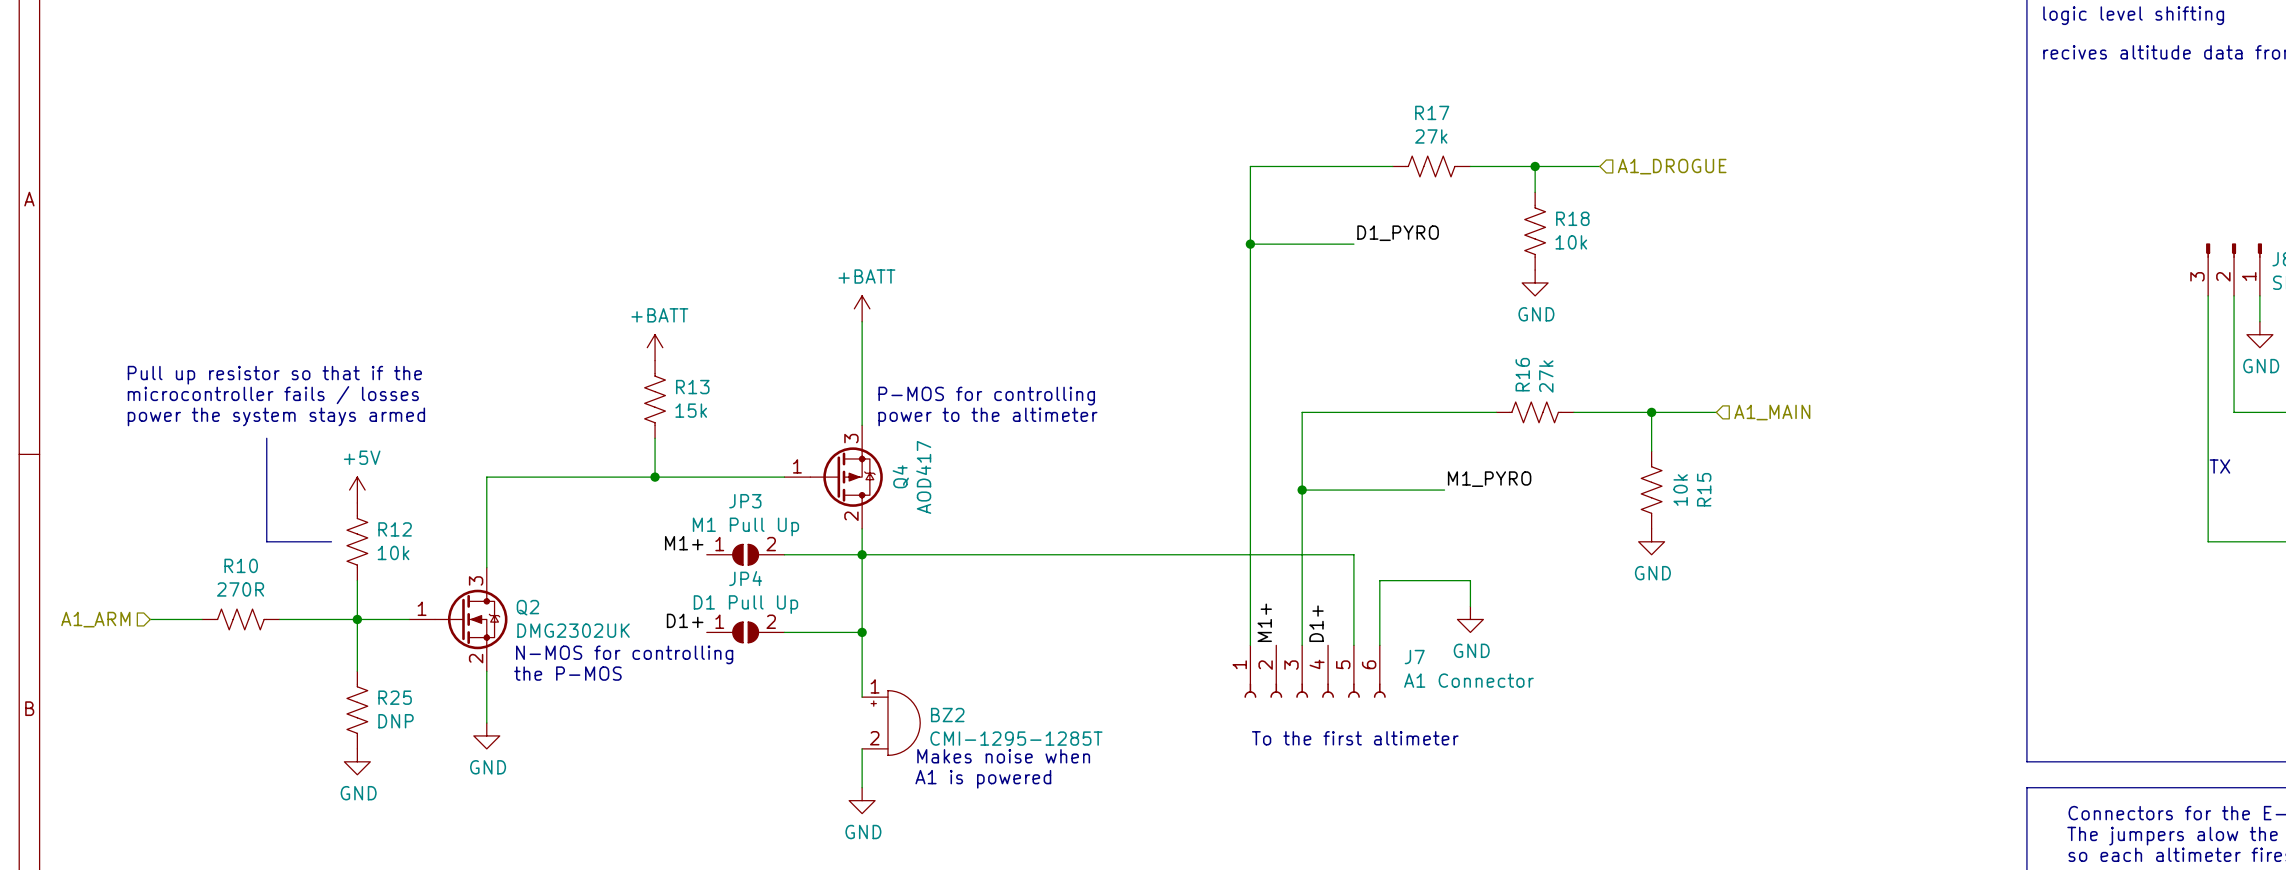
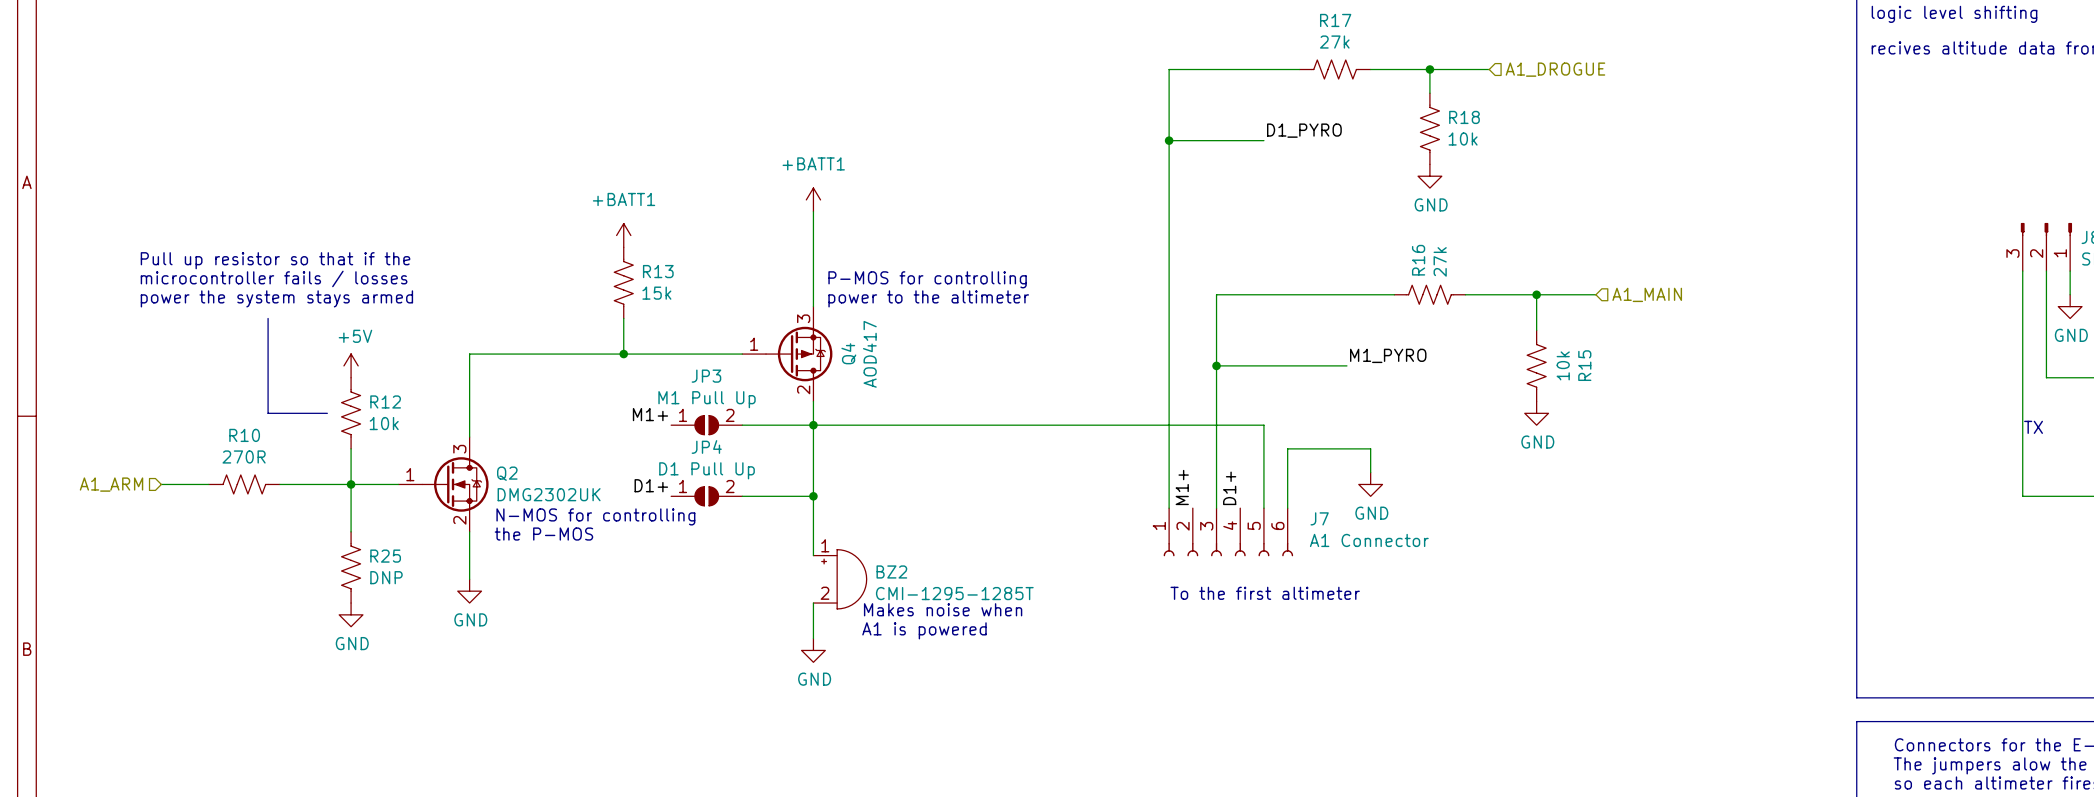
junction: none -> (1429, 69)
junction: none -> (1169, 140)
wire: (1392, 166) (1250, 166) (1250, 645) -> (1299, 69) (1169, 69) (1169, 508)
R17 position: (1431, 166) -> (1335, 69)
wire: (1470, 166) (1599, 166) -> (1370, 69) (1489, 69)
wire: (1535, 166) (1535, 192) -> (1429, 69) (1429, 93)
junction: (1535, 166) -> none
hierarchical label position: A1_DROGUE (1672, 166) -> A1_DROGUE (1555, 69)
power symbol: none -> +BATT1 (813, 199)
R18 position: (1535, 231) -> (1429, 128)
label position: D1_PYRO (1398, 233) -> D1_PYRO (1304, 130)
wire: (1250, 244) (1353, 244) -> (1169, 140) (1263, 140)
junction: (1250, 244) -> none
power symbol: none -> +BATT1 (623, 235)
power symbol position: GND (1535, 282) -> GND (1429, 176)
power symbol: +BATT (862, 308) -> none
wire: (862, 321) (862, 425) -> (813, 211) (813, 306)
junction: none -> (1536, 294)
power symbol: +BATT (655, 347) -> none
text position: Pull up resistor so that if the (274, 375) -> Pull up resistor so that if the (275, 260)
junction: none -> (623, 354)
text position: microcontroller fails / losses (273, 395) -> microcontroller fails / losses (274, 278)
text position: P-MOS for controlling (986, 396) -> P-MOS for controlling (927, 279)
R13 position: (655, 399) -> (623, 282)
wire: none -> (1216, 365) (1346, 365)
junction: none -> (1216, 365)
wire: (1496, 412) (1302, 412) (1302, 645) -> (1394, 294) (1216, 294) (1216, 508)
R16 position: (1535, 412) -> (1429, 294)
wire: (1573, 412) (1716, 412) -> (1465, 294) (1595, 294)
wire: (1651, 412) (1651, 451) -> (1536, 294) (1536, 330)
junction: (1651, 412) -> none
hierarchical label position: A1_MAIN (1772, 412) -> A1_MAIN (1647, 294)
text position: power the system stays armed (276, 416) -> power the system stays armed (276, 298)
text position: power to the altimeter (987, 416) -> power to the altimeter (928, 298)
line: (266, 438) (266, 541) (331, 541) -> (268, 318) (268, 413) (327, 413)
wire: (655, 438) (655, 477) -> (623, 318) (623, 354)
power symbol: none -> GND (1536, 413)
junction: none -> (813, 425)
junction: (655, 477) -> none
wire: (784, 477) (486, 477) (486, 567) -> (742, 354) (469, 354) (469, 437)
Q4 position: (833, 477) -> (787, 354)
label position: M1_PYRO (1489, 479) -> M1_PYRO (1388, 355)
power symbol position: +5V (357, 490) -> +5V (351, 365)
wire: (1302, 490) (1405, 490) -> (1287, 508) (1287, 448)
junction: (1302, 490) -> none
wire: none -> (1323, 448) (1370, 448) (1370, 472)
R15 position: (1651, 490) -> (1536, 365)
junction: none -> (351, 484)
wire: (862, 528) (862, 697) -> (813, 401) (813, 555)
power symbol: none -> GND (1370, 484)
R12 position: (357, 541) -> (351, 413)
power symbol: GND (1651, 541) -> none
label position: M1+ (684, 543) -> M1+ (650, 414)
JP3 position: (745, 554) -> (706, 425)
wire: (784, 554) (1353, 554) (1353, 645) -> (742, 425) (1263, 425) (1263, 508)
junction position: (862, 554) -> (813, 496)
wire: (357, 580) (357, 671) -> (351, 448) (351, 531)
wire: (1470, 606) (1470, 580) (1379, 580) (1379, 645) -> none
hierarchical label position: A1_ARM (95, 619) -> A1_ARM (111, 484)
wire: (150, 619) (202, 619) -> (161, 484) (208, 484)
R10 position: (240, 619) -> (244, 484)
wire: (279, 619) (409, 619) -> (279, 484) (398, 484)
junction: (357, 619) -> none
Q2 position: (458, 619) -> (443, 484)
power symbol: GND (1470, 619) -> none
label position: D1+ (685, 620) -> D1+ (651, 485)
label position: M1+ (1264, 622) -> M1+ (1182, 487)
label position: D1+ (1316, 623) -> D1+ (1229, 488)
JP4 position: (745, 632) -> (706, 496)
wire: (784, 632) (862, 632) -> (742, 496) (813, 496)
junction: (862, 632) -> none
power symbol: none -> GND (469, 591)
text position: N-MOS for controlling (624, 654) -> N-MOS for controlling (595, 516)
power symbol: none -> GND (351, 614)
wire: (486, 671) (486, 723) -> (469, 531) (469, 579)
J7 position: (1315, 671) -> (1228, 532)
text position: the P-MOS (567, 673) -> the P-MOS (543, 534)
R25 position: (357, 710) -> (351, 567)
BZ2 position: (891, 723) -> (840, 579)
power symbol: GND (486, 735) -> none
text position: To the first altimeter (1355, 738) -> To the first altimeter (1265, 593)
wire: (862, 748) (862, 787) -> (813, 603) (813, 638)
text position: Makes noise when (1003, 756) -> Makes noise when (943, 609)
power symbol: GND (357, 761) -> none
text position: A1 is powered (983, 779) -> A1 is powered (924, 630)
power symbol position: GND (862, 800) -> GND (813, 650)

